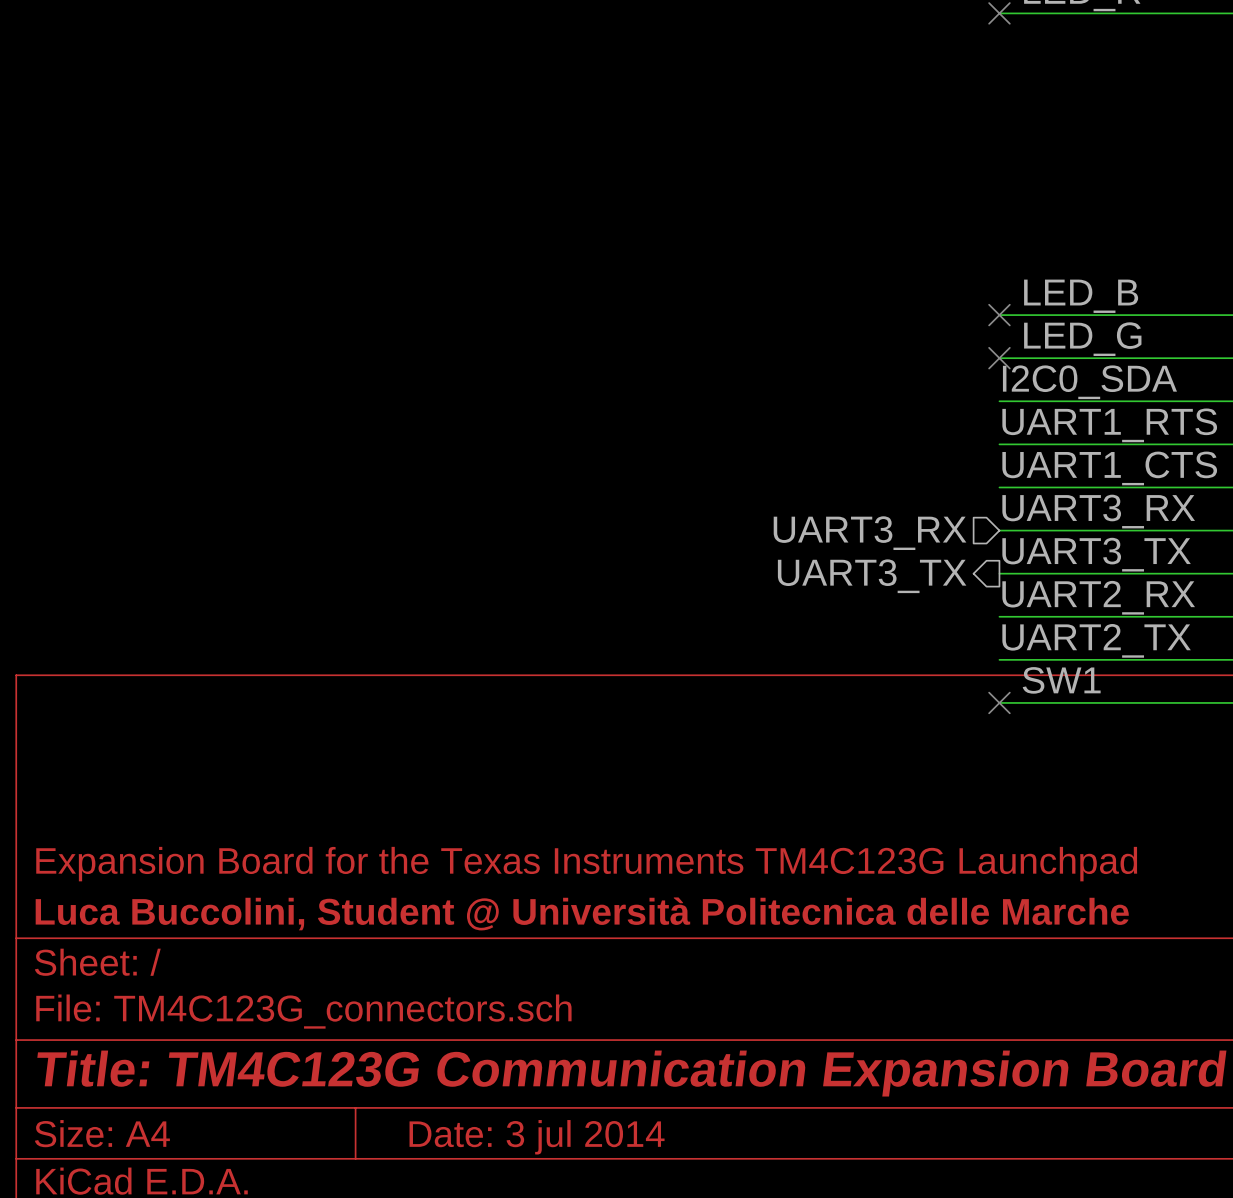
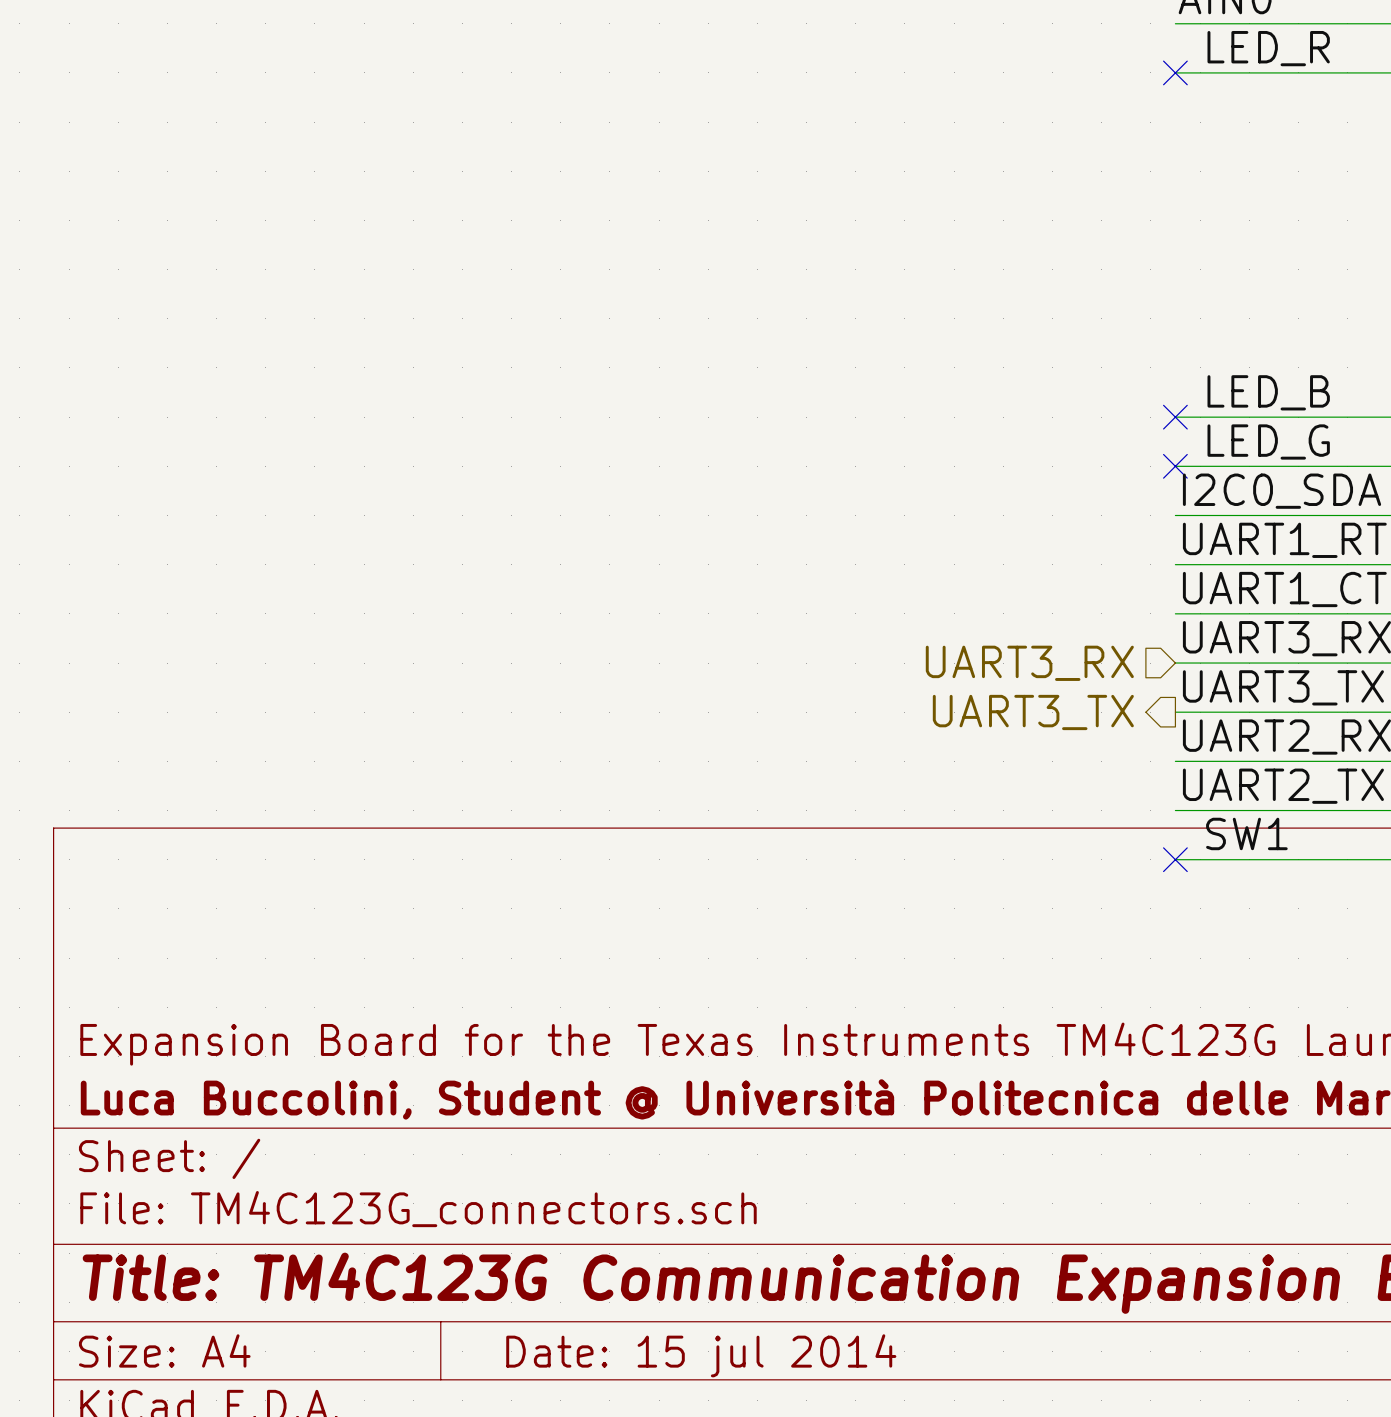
title block: Date: 3 jul 2014 (537, 1137) -> Date: 15 jul 2014 (701, 1355)

